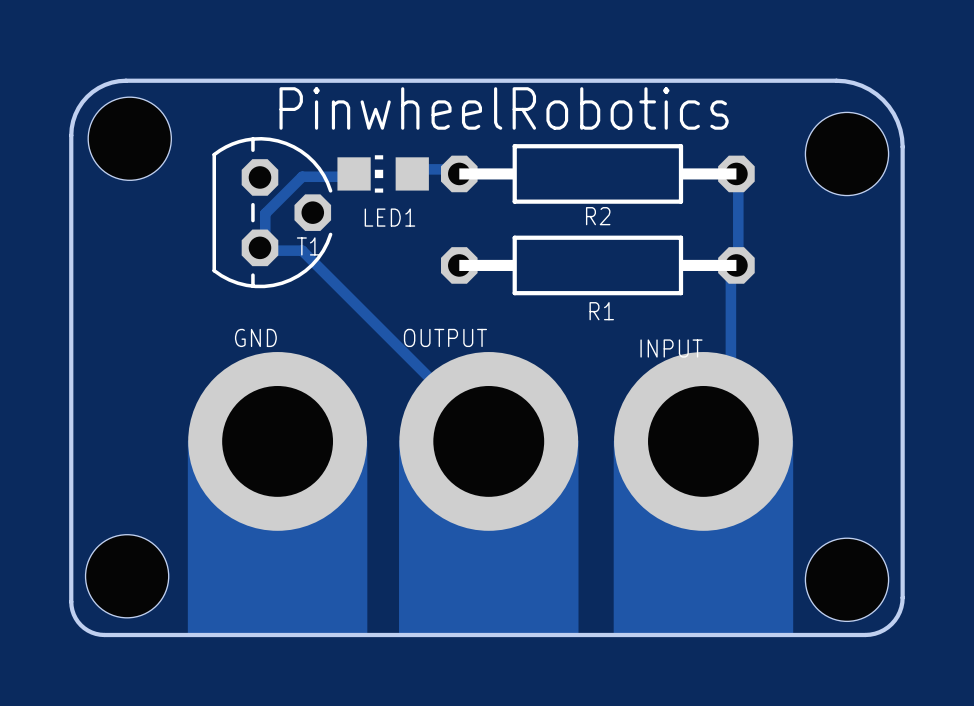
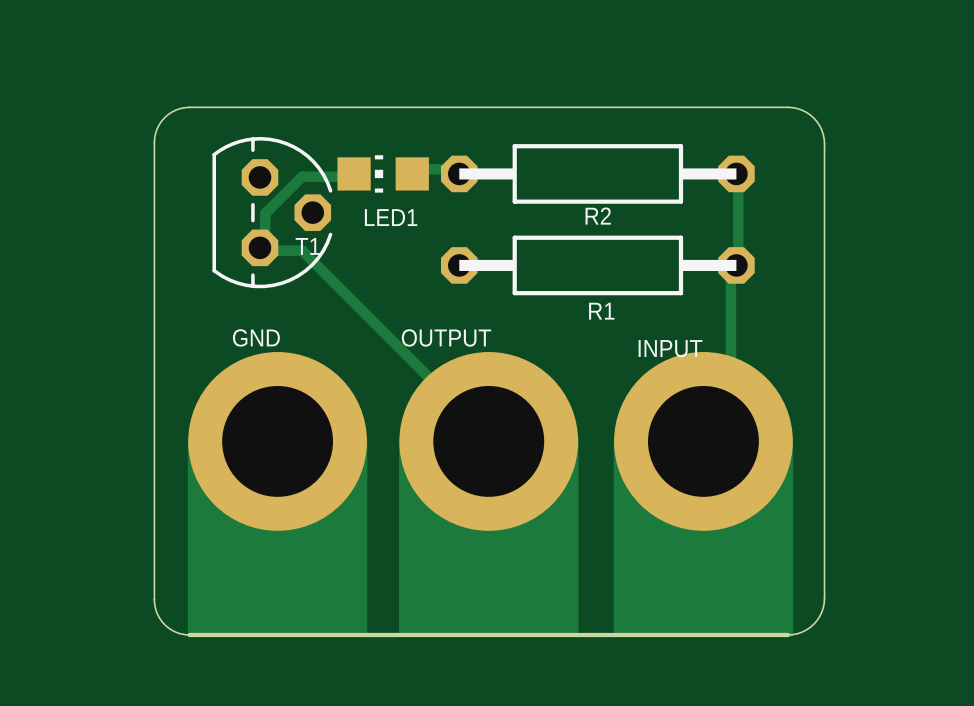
text: PinwheelRobotics (504, 108) -> none
hole: (129, 138) -> none
hole: (847, 153) -> none
hole: (127, 576) -> none
hole: (847, 579) -> none
board edge: (189, 634) (95, 633) (80, 625) (73, 614) (71, 606) (71, 128) (75, 114) (87, 96) (105, 84) (118, 81) (836, 80) (861, 85) (876, 94) (888, 106) (897, 121) (902, 146) (902, 602) (894, 620) (888, 627) (875, 633) (787, 634) -> (189, 634) (176, 632) (164, 624) (157, 613) (154, 599) (154, 137) (159, 124) (168, 114) (180, 108) (189, 107) (787, 107) (801, 110) (813, 118) (821, 129) (824, 143) (824, 598) (821, 612) (813, 624) (801, 632) (787, 634)

